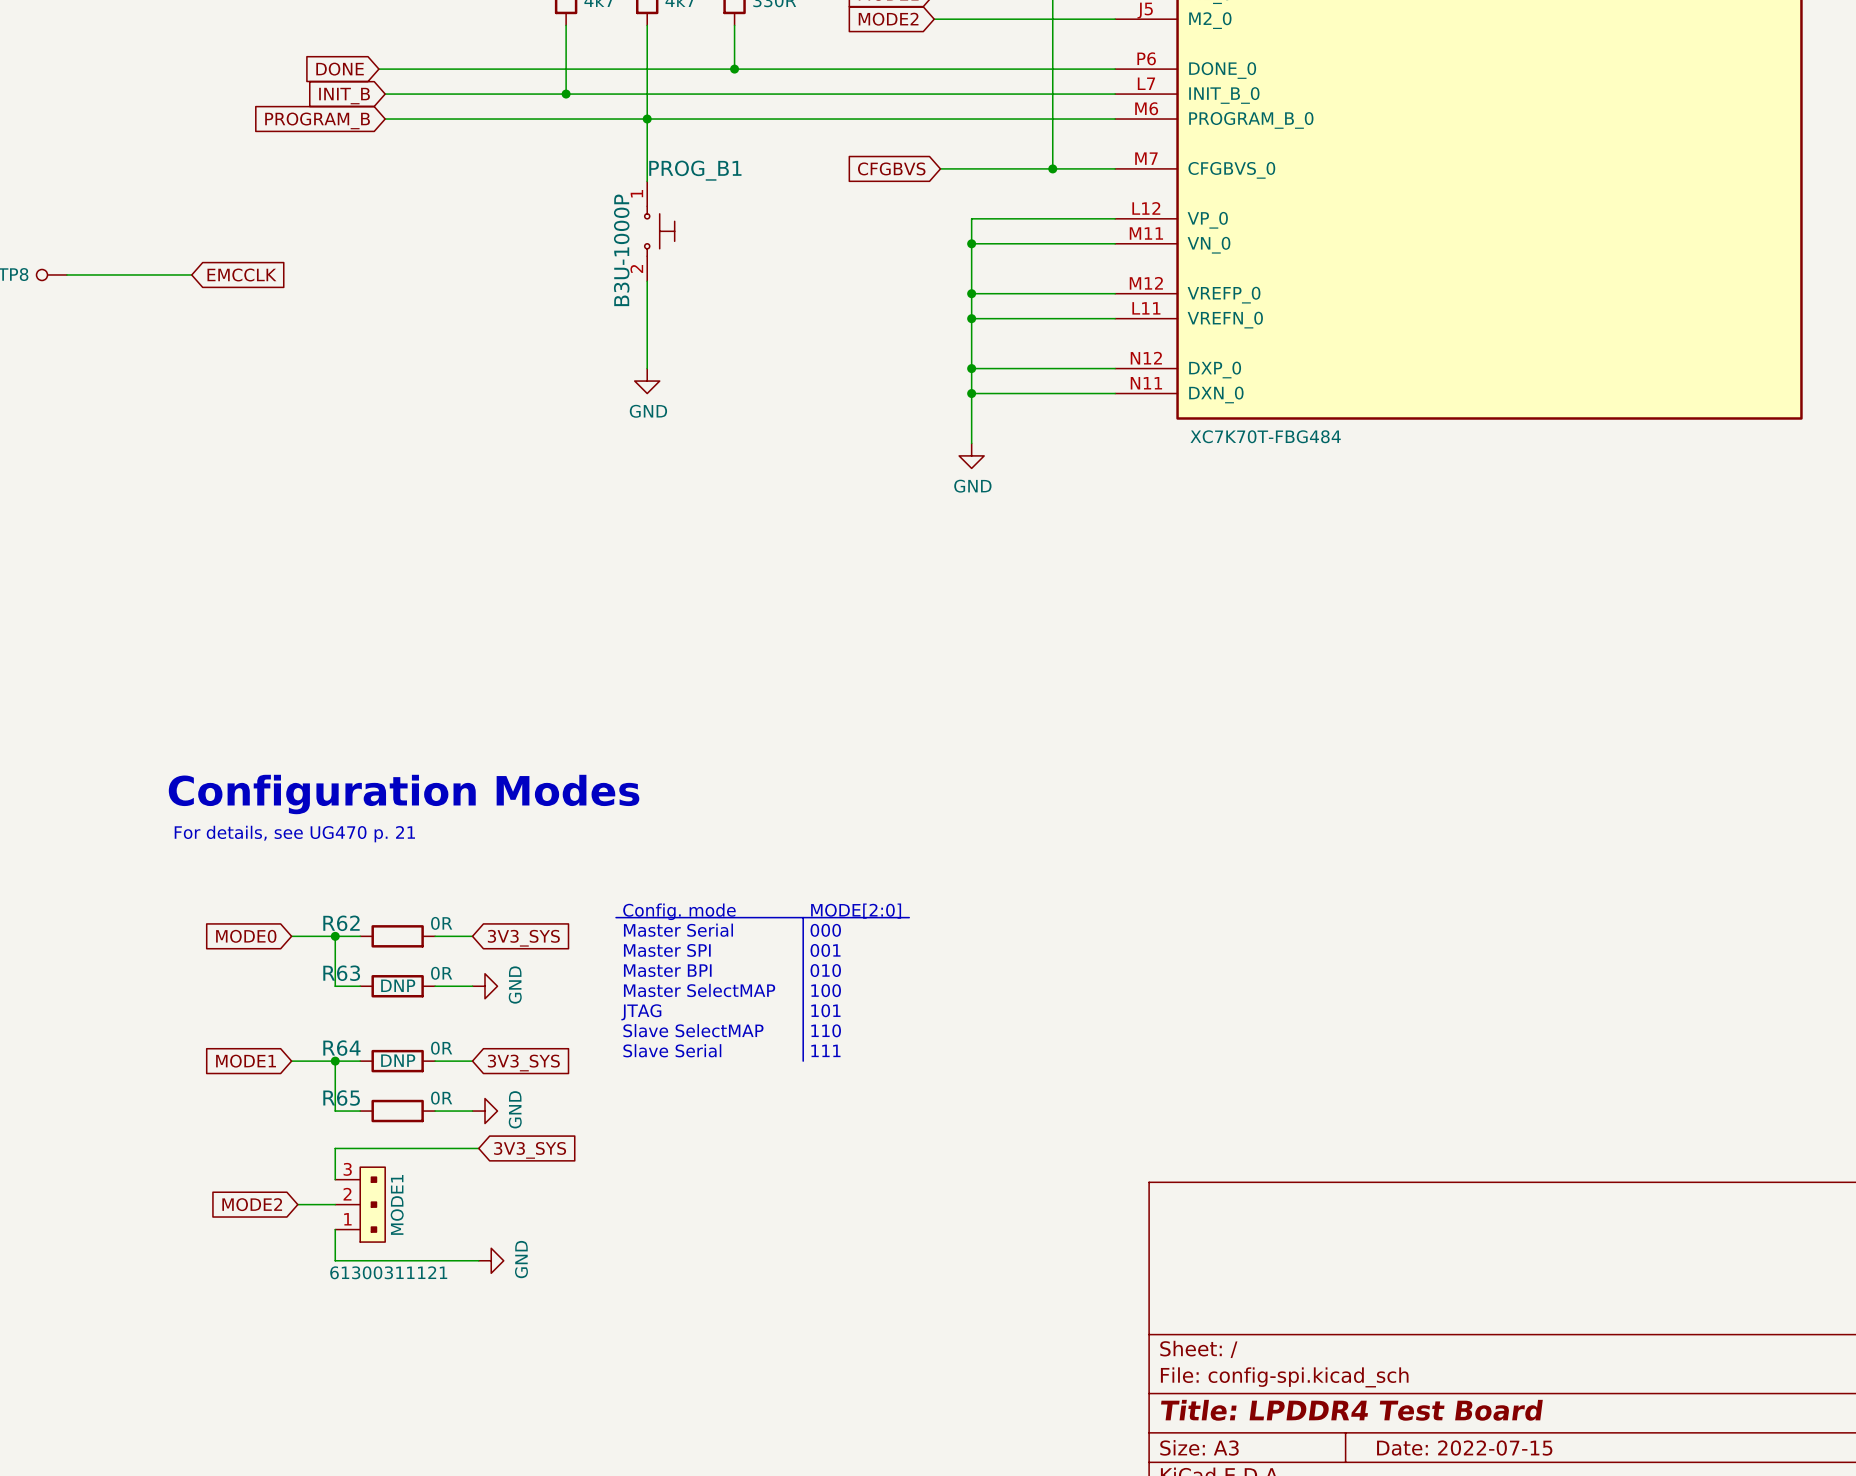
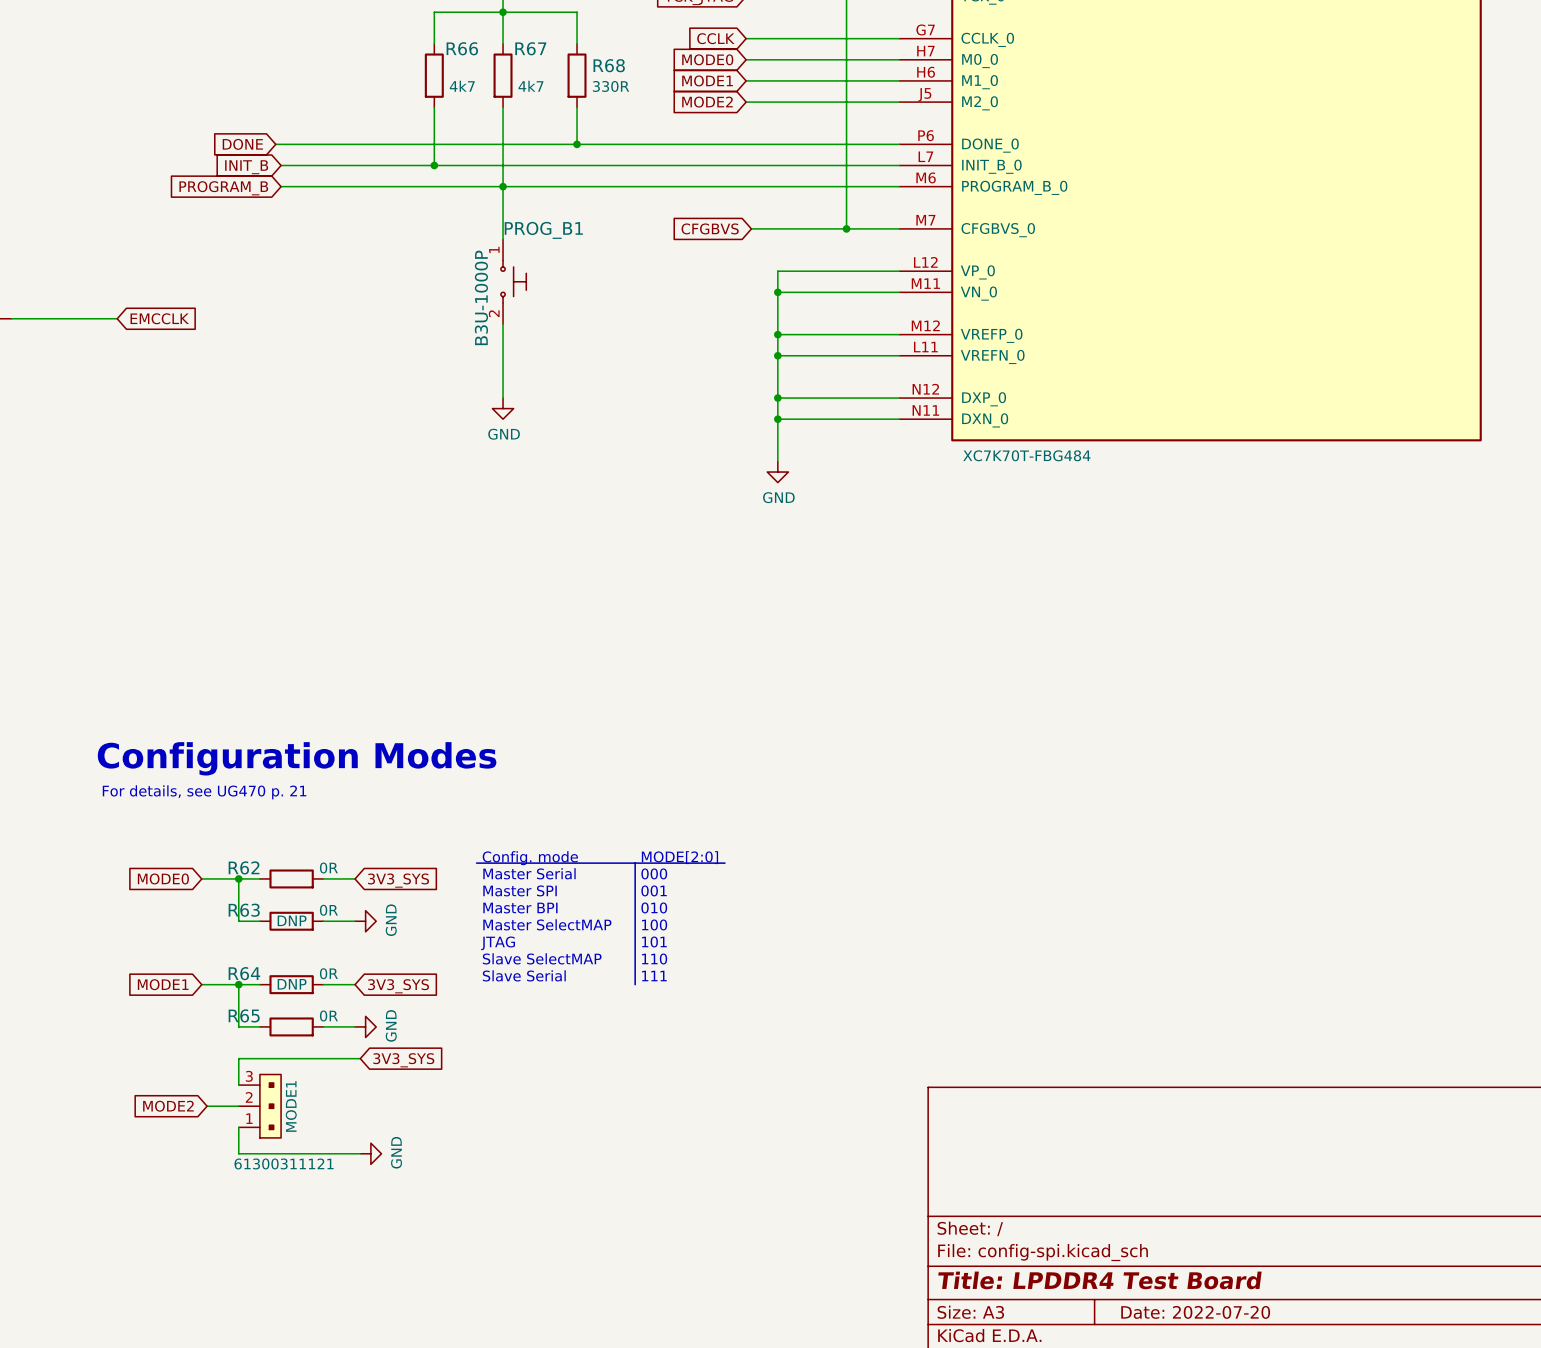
title block: Date: 2022-07-15 (1464, 1448) -> Date: 2022-07-20 (1195, 1312)

